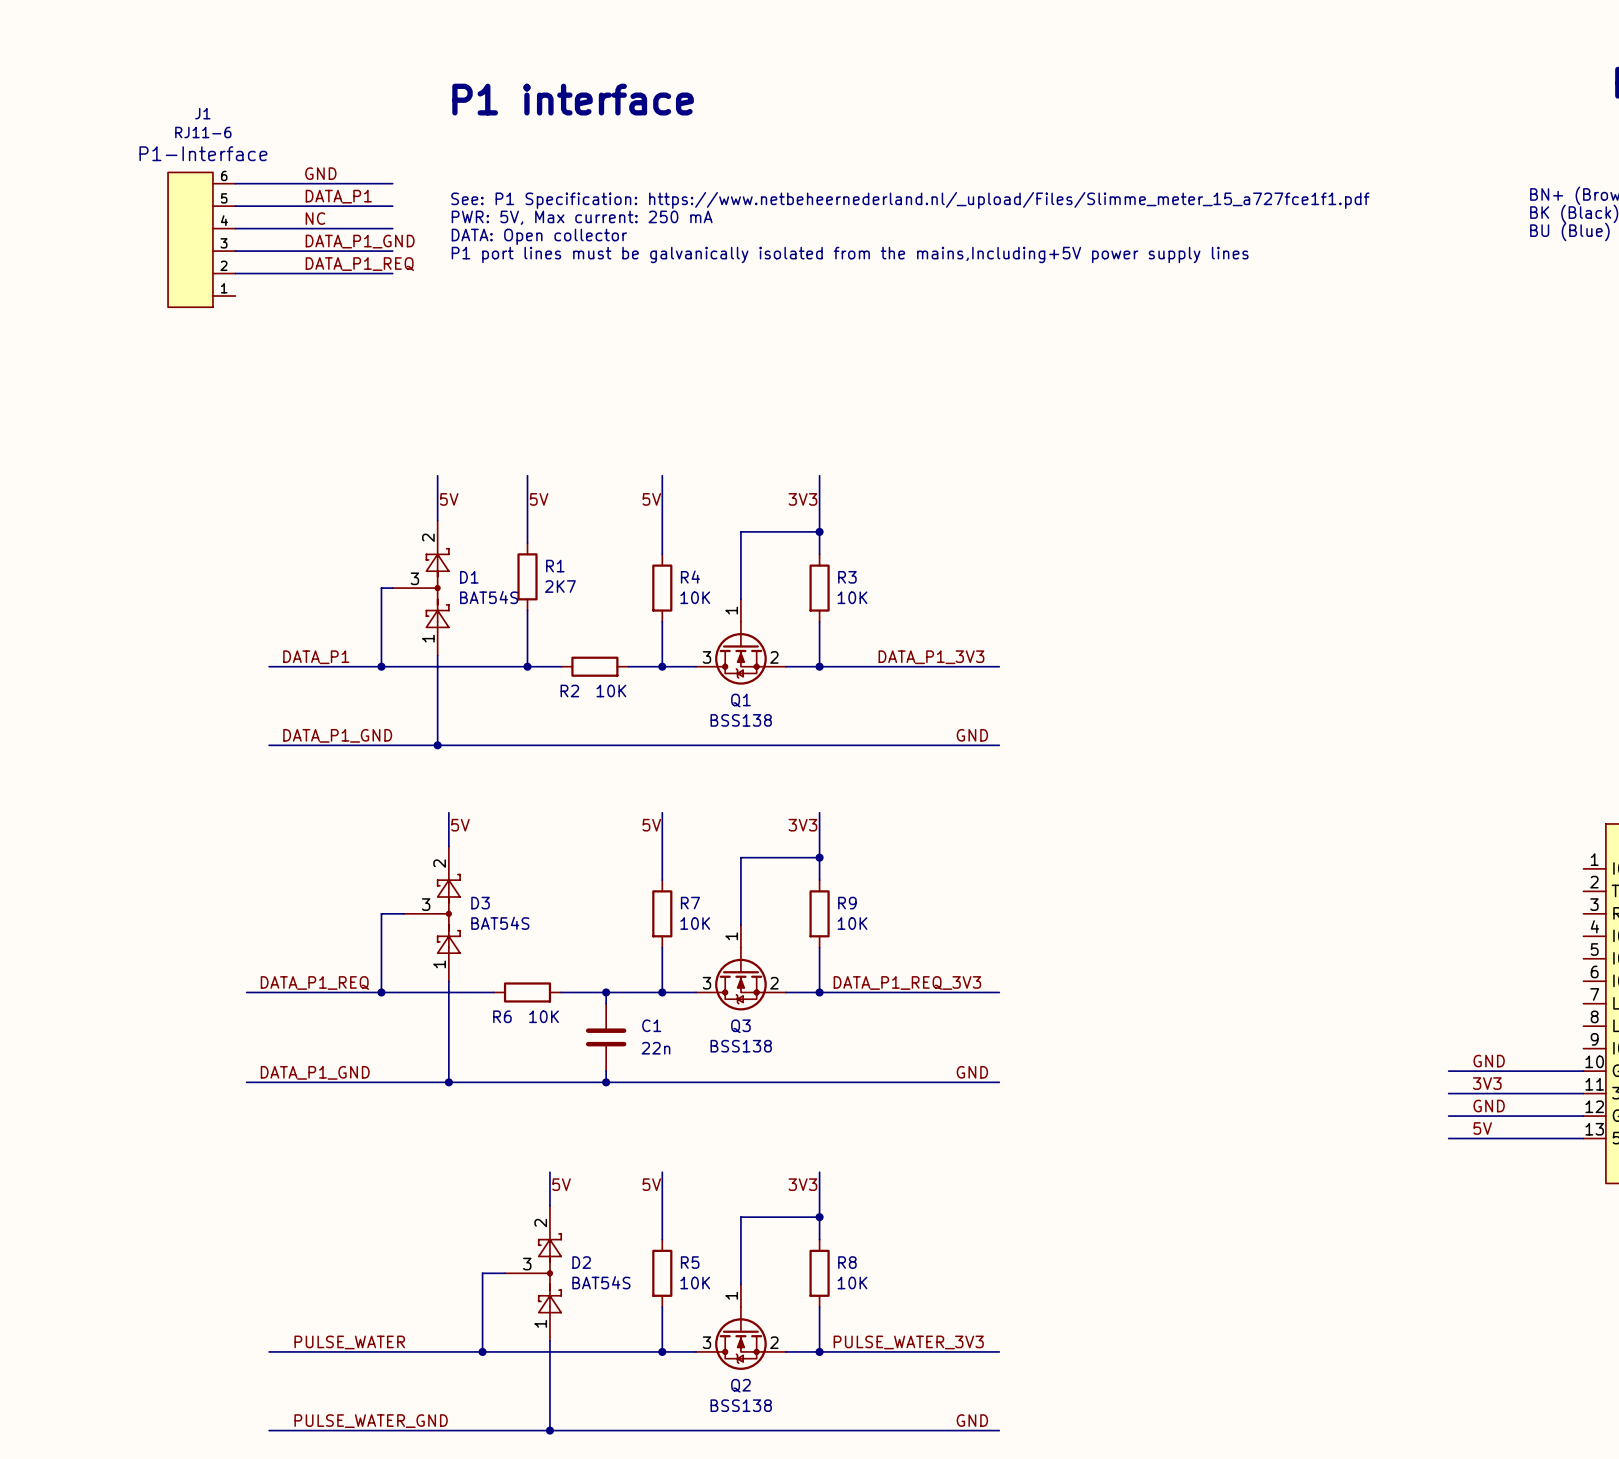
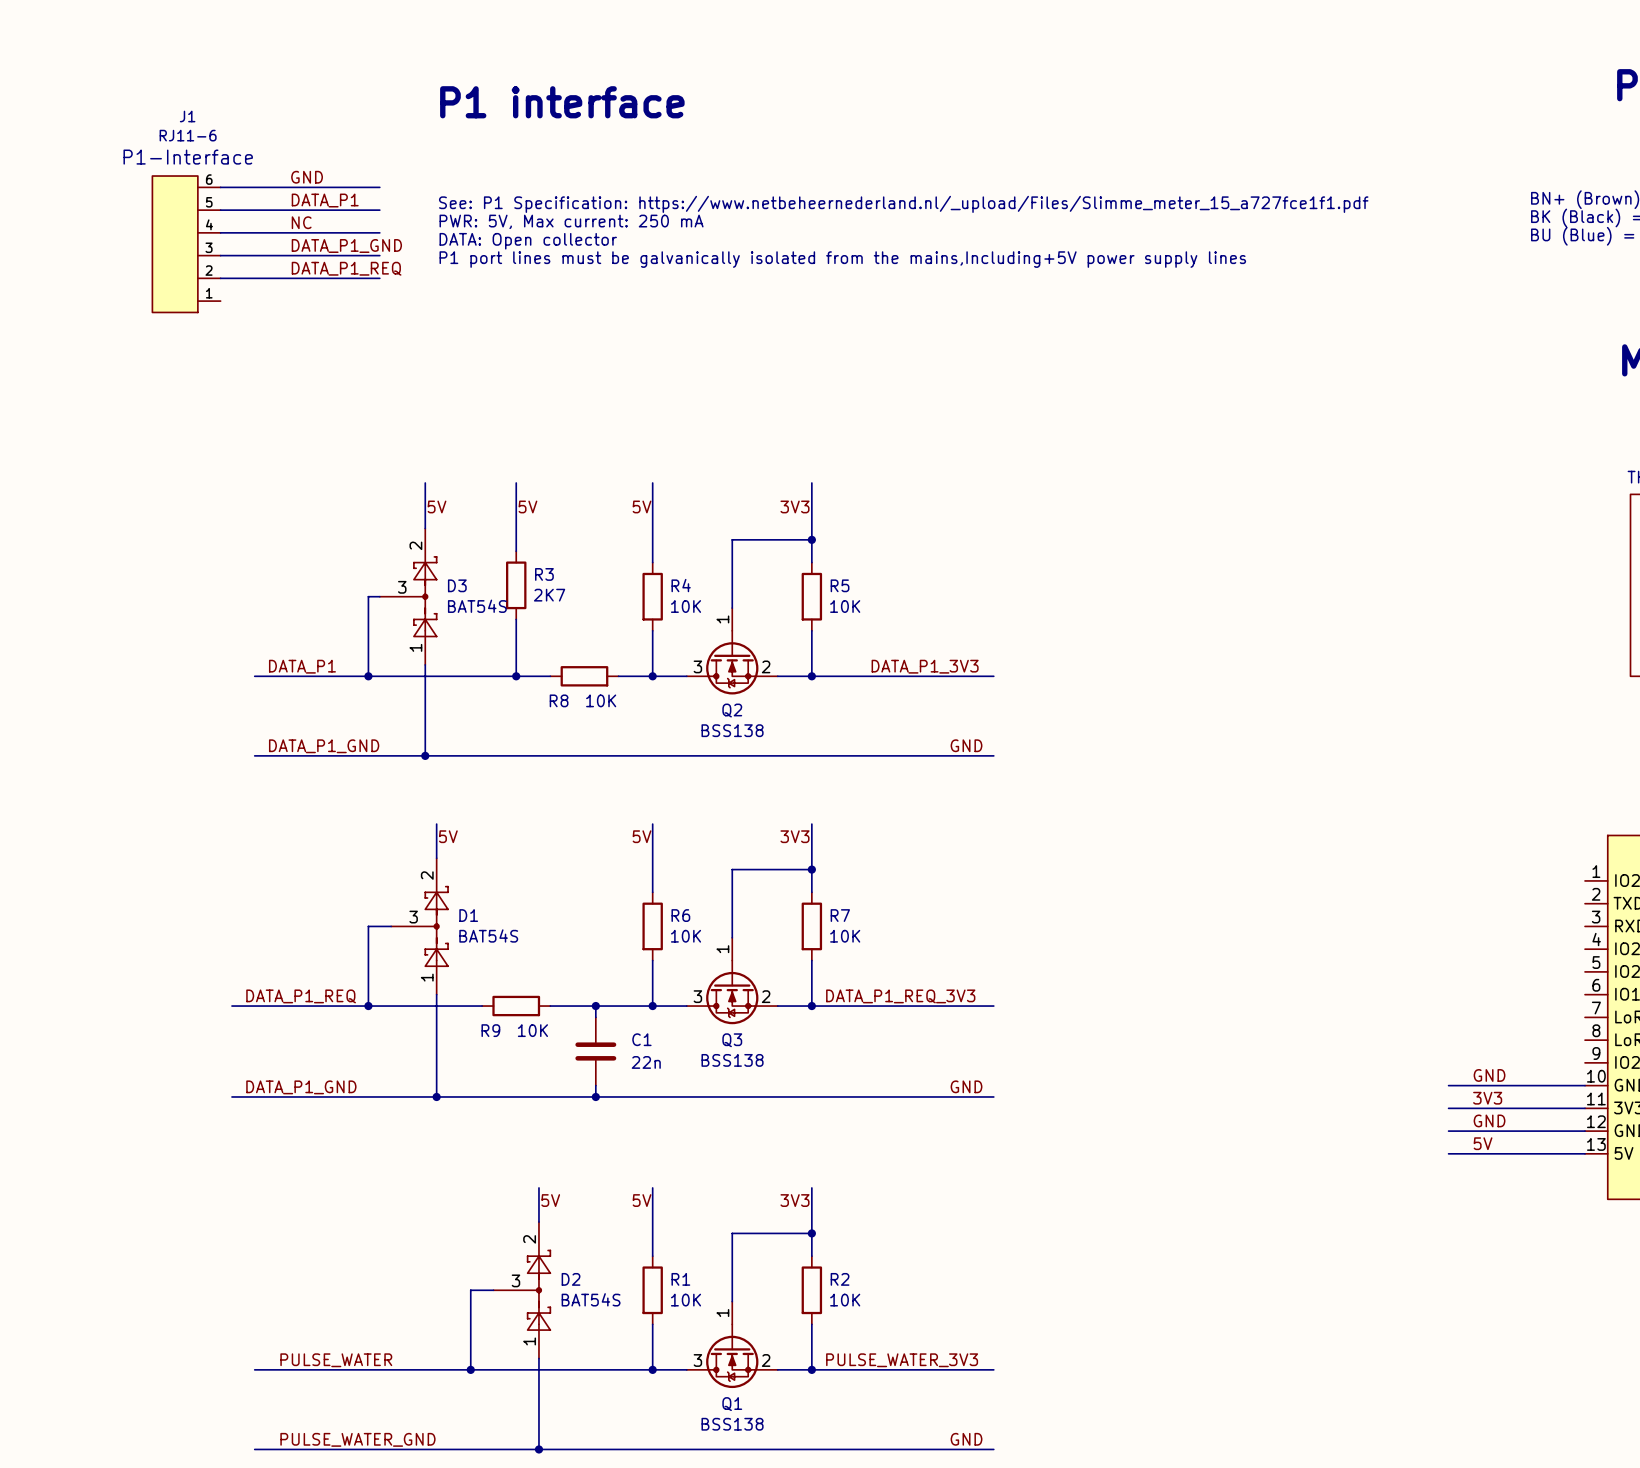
R1 name: R1 (555, 566) -> R3 (544, 574)
D1 name: D1 (469, 577) -> D3 (457, 585)
R3 name: R3 (847, 577) -> R5 (840, 585)
R2 name: R2 (569, 691) -> R8 (559, 700)
Q1 name: Q1 (740, 700) -> Q2 (732, 710)
D3 name: D3 (480, 903) -> D1 (468, 915)
R7 name: R7 (690, 903) -> R6 (680, 915)
R9 name: R9 (847, 903) -> R7 (840, 915)
R6 name: R6 (502, 1016) -> R9 (490, 1030)
R5 name: R5 (690, 1262) -> R1 (680, 1279)
R8 name: R8 (847, 1262) -> R2 (840, 1279)
Q2 name: Q2 (740, 1385) -> Q1 (732, 1404)

